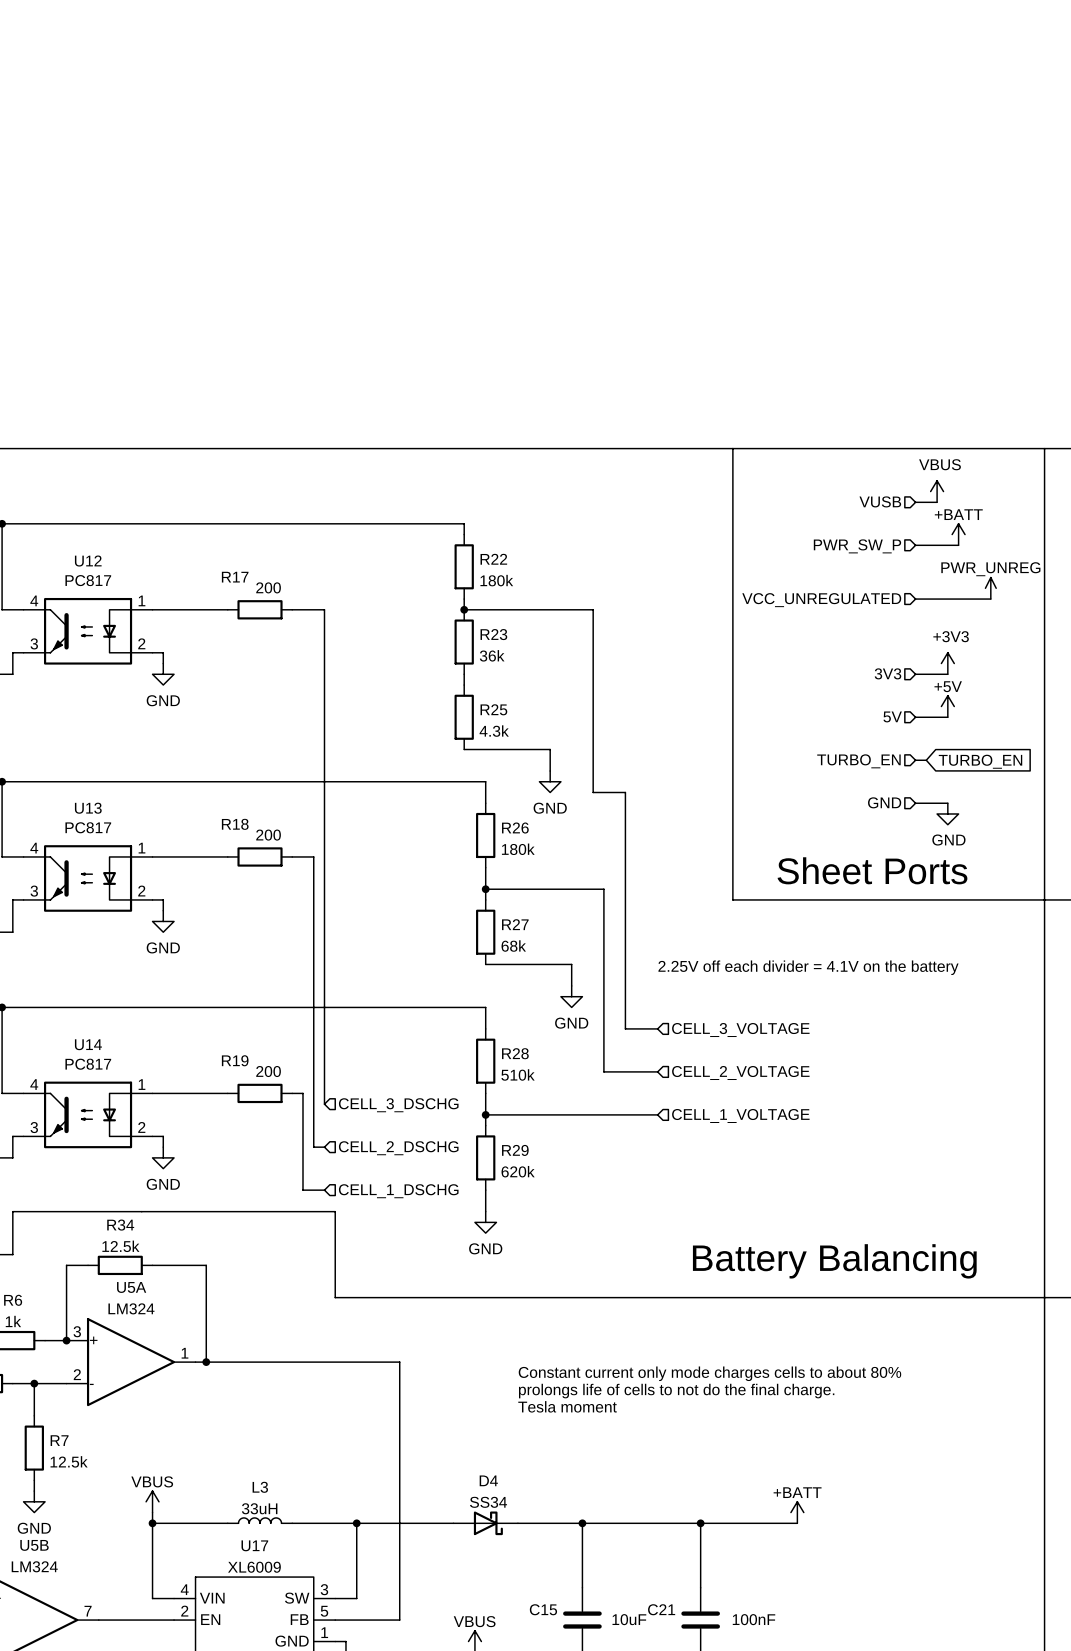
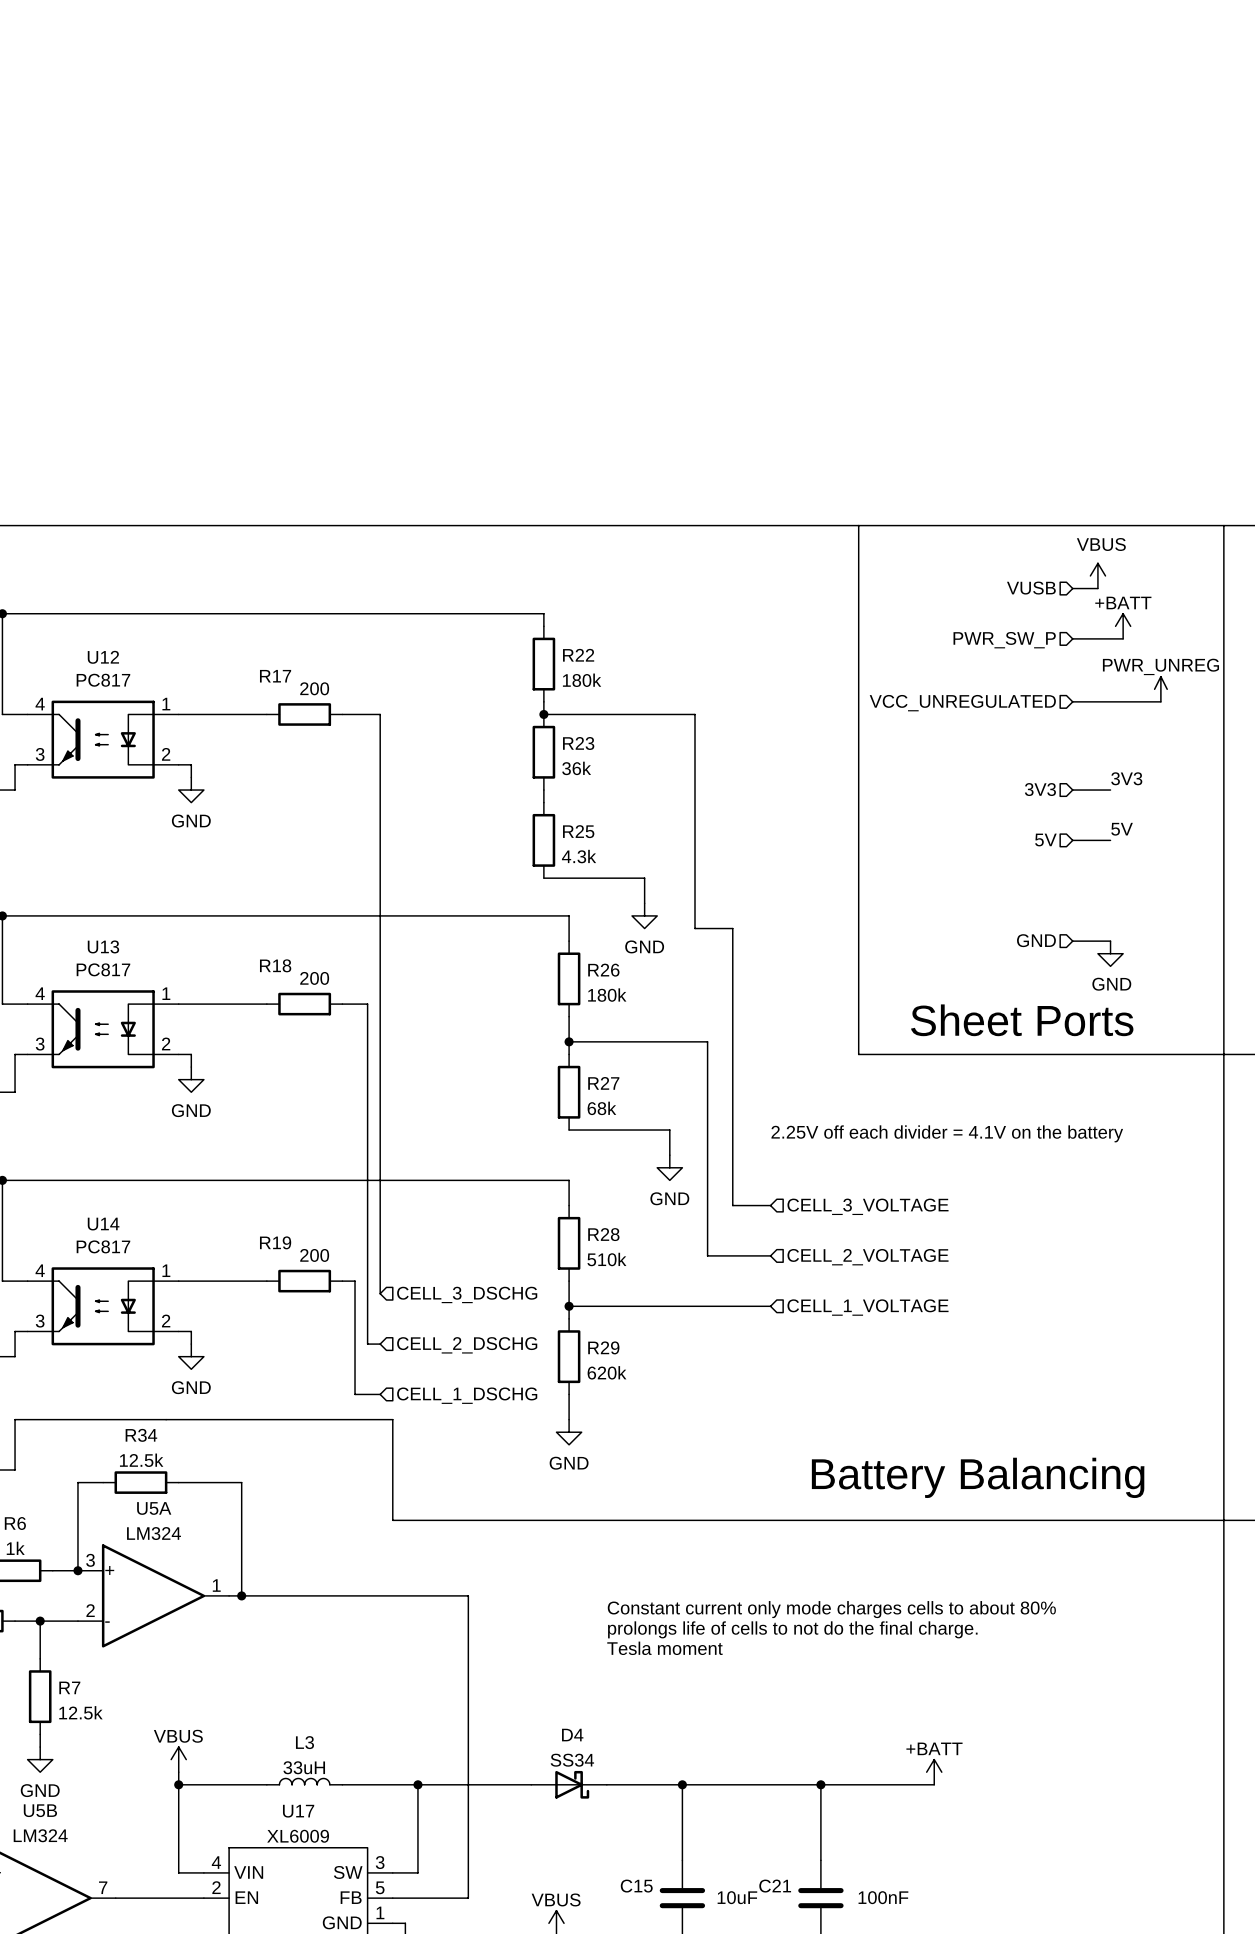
power symbol: +3V3 (947, 663) -> none
label: none -> 3V3 (1126, 778)
power symbol: +5V (947, 706) -> none
label: none -> 5V (1122, 829)
wire: (915, 760) (926, 760) -> none
hierarchical label: TURBO_EN (858, 761) -> none
global label: TURBO_EN (980, 761) -> none

